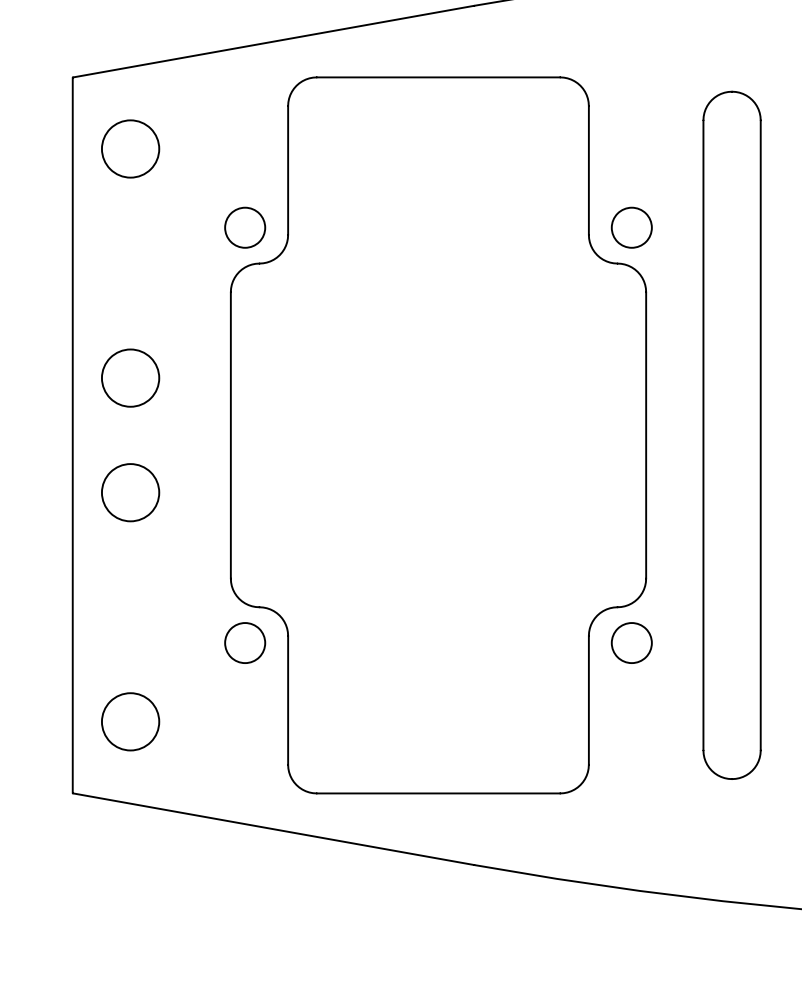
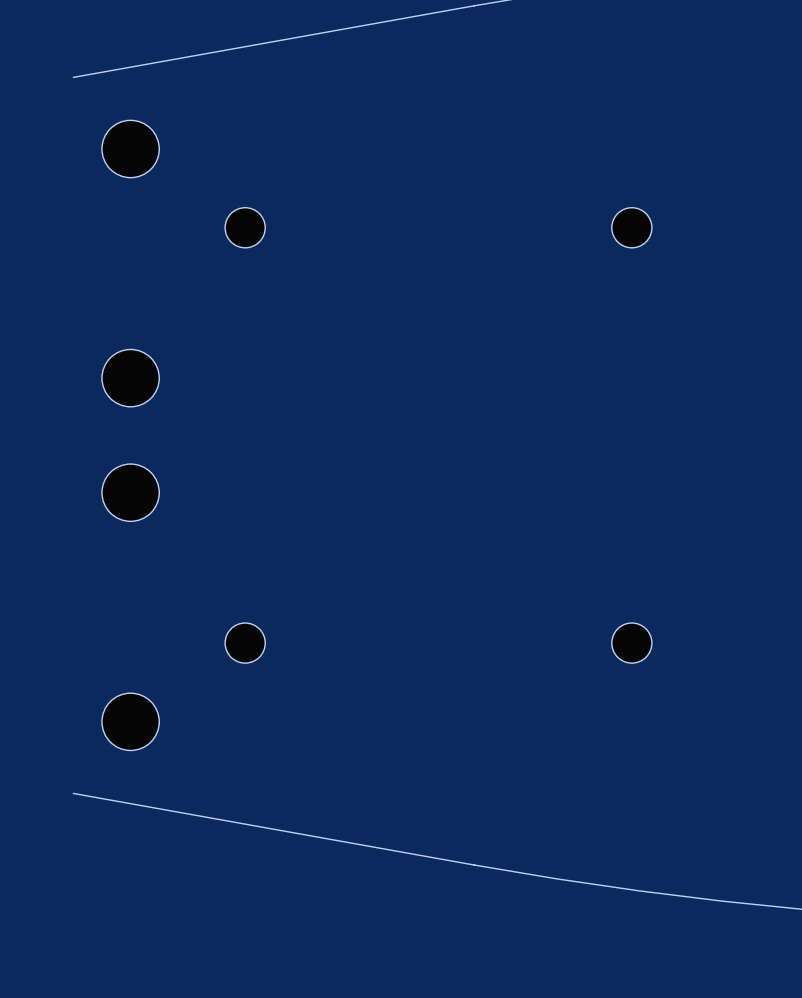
board edge: (72, 77) (72, 793) -> none
board edge: (316, 77) (560, 77) (577, 83) (586, 95) (588, 106) (589, 242) (594, 252) (603, 259) (624, 264) (634, 269) (642, 277) (645, 288) (646, 578) (643, 589) (634, 601) (624, 606) (603, 611) (591, 624) (588, 635) (588, 768) (582, 782) (571, 791) (560, 793) (316, 793) (299, 787) (290, 775) (288, 764) (287, 628) (282, 618) (273, 611) (252, 606) (242, 601) (234, 592) (231, 582) (230, 292) (233, 281) (242, 269) (252, 264) (273, 259) (285, 245) (288, 234) (288, 102) (291, 91) (299, 83) (316, 77) -> none
board edge: (732, 91) (721, 93) (711, 100) (705, 109) (703, 120) (703, 750) (705, 761) (711, 770) (721, 776) (732, 779) (743, 776) (752, 770) (758, 761) (760, 750) (760, 120) (758, 109) (752, 100) (743, 93) (732, 91) -> none

